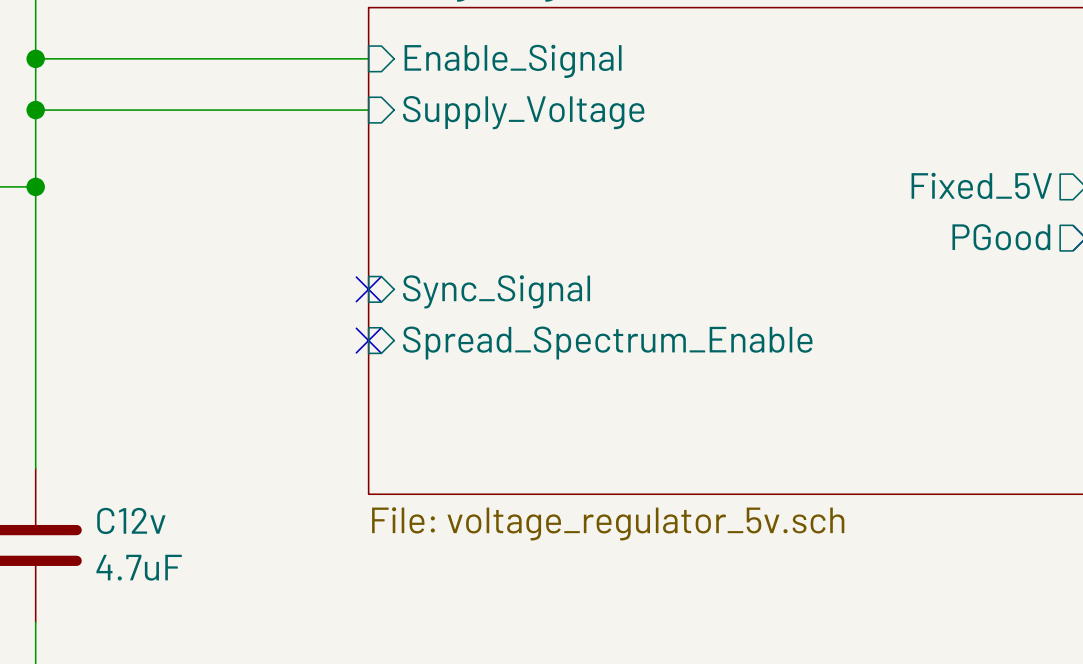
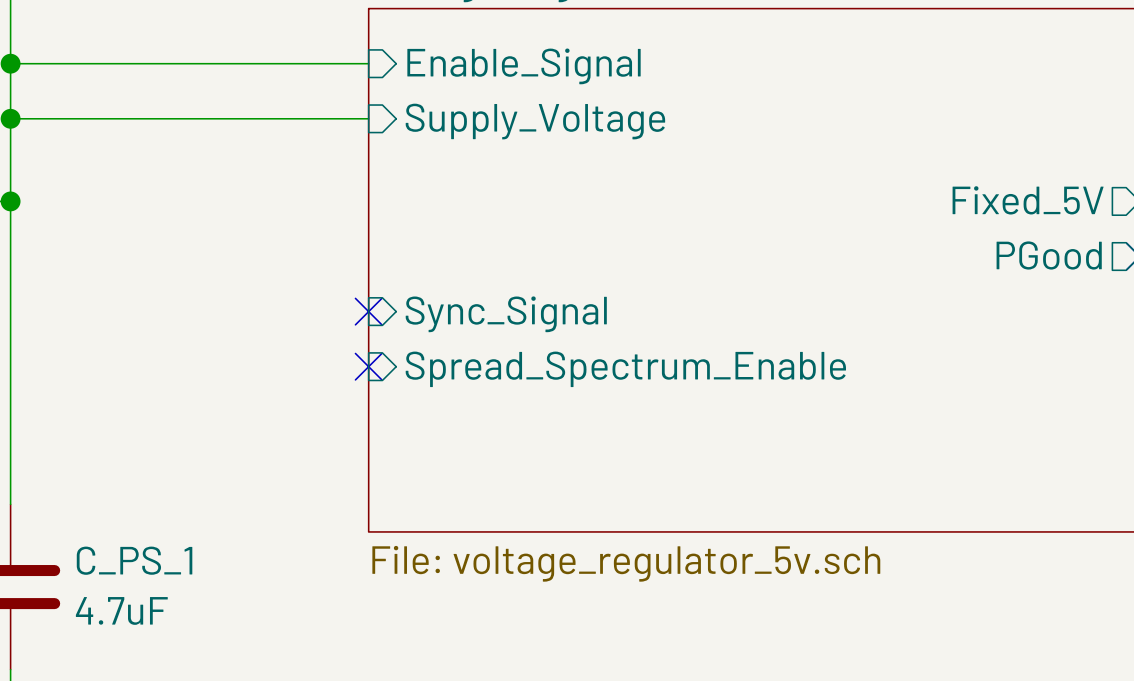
C12v name: C12v (131, 520) -> C_PS_1 (134, 560)

